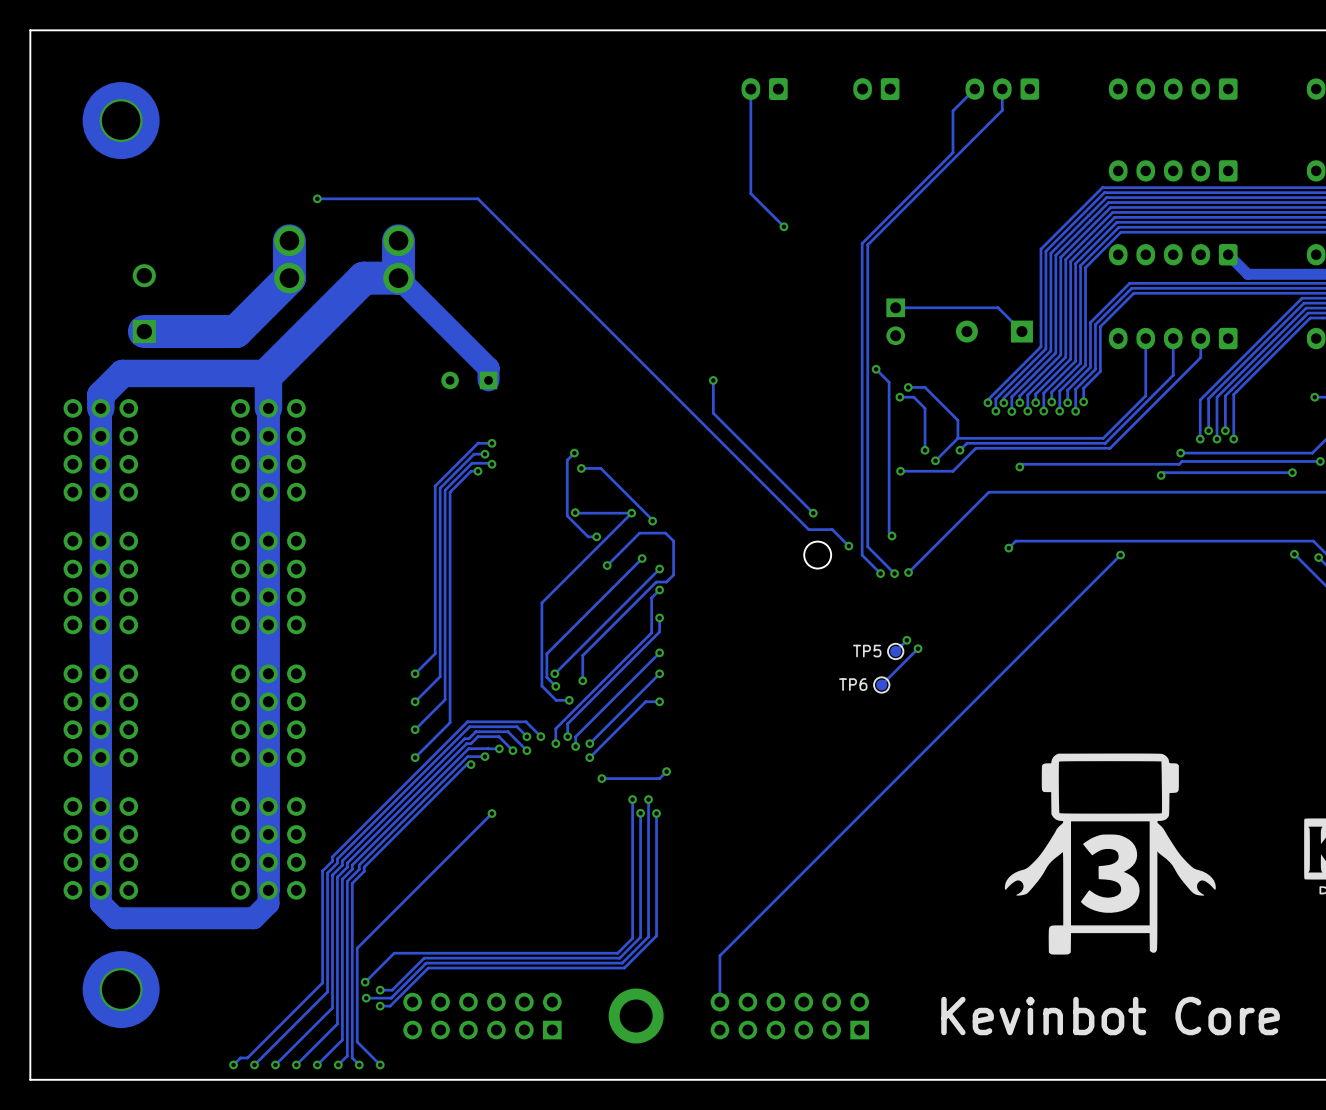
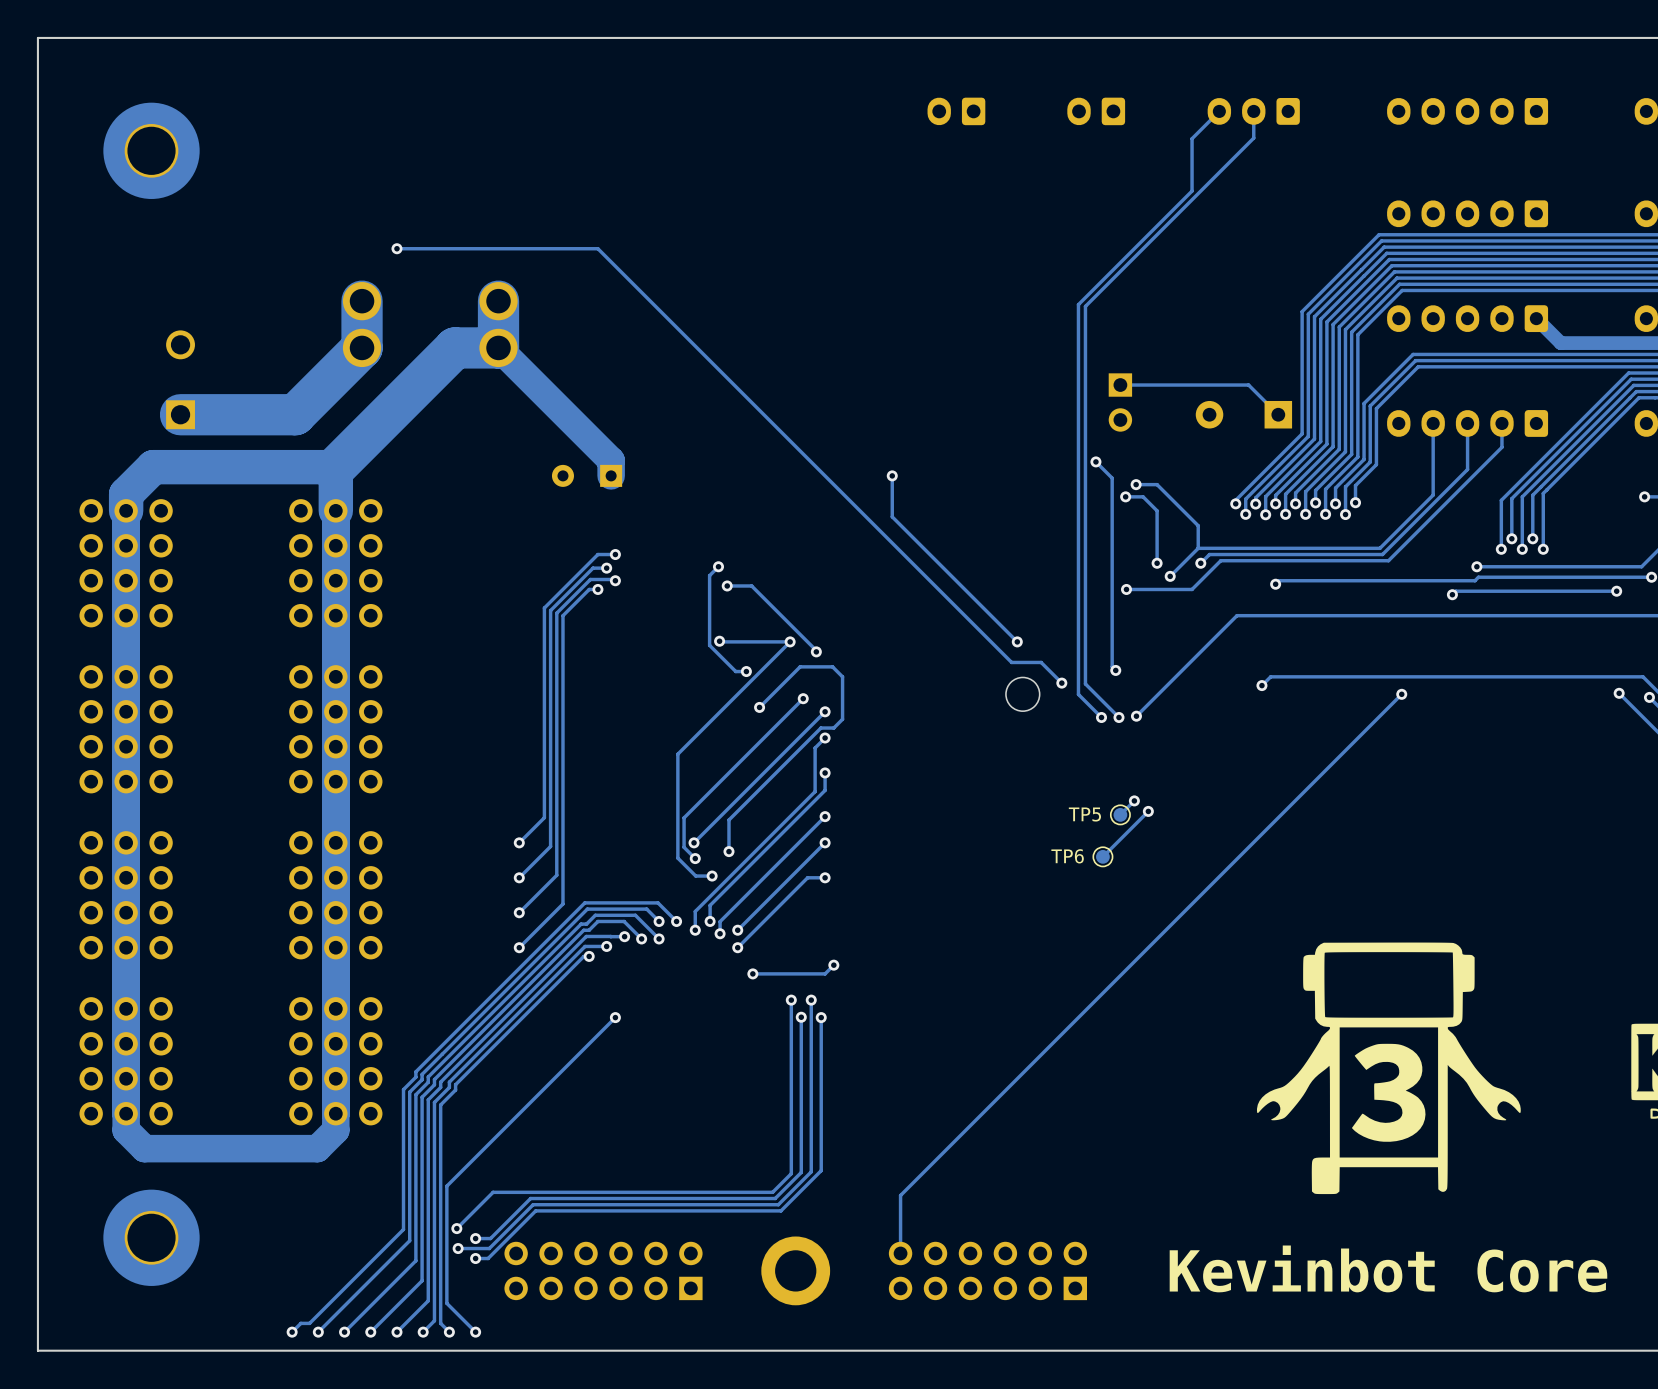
track: (750, 89) (750, 193) (783, 226) -> none
via: (783, 226) -> none

